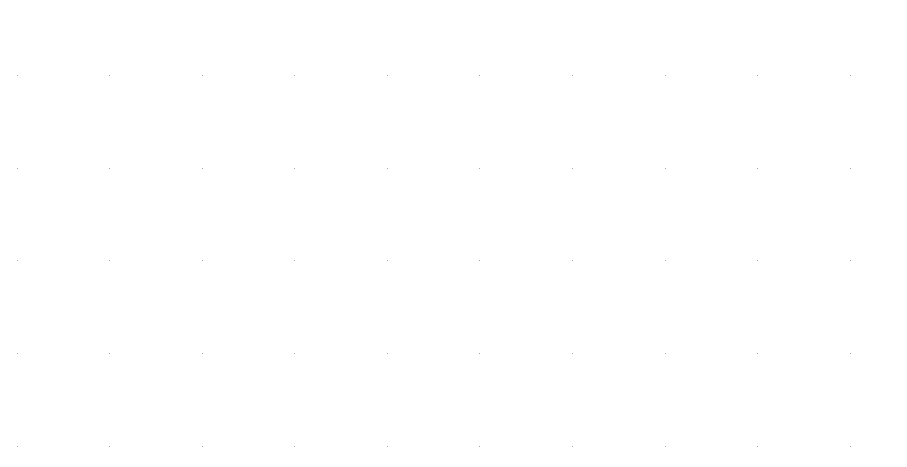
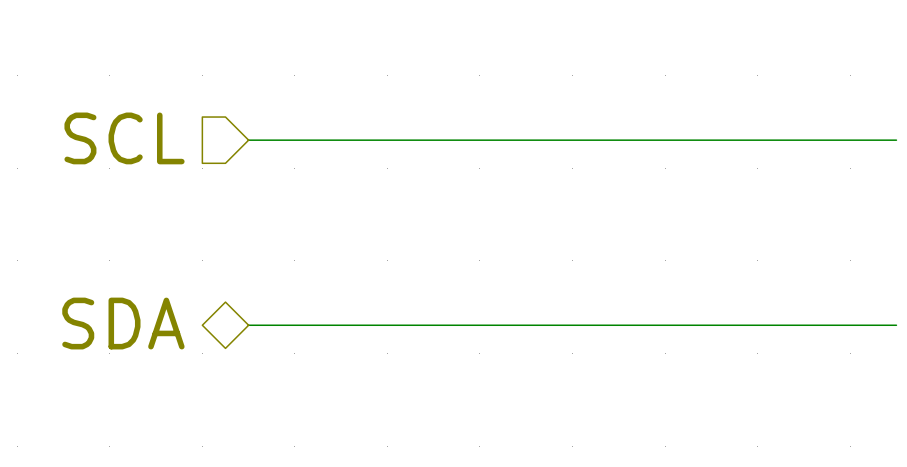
hierarchical label: none -> SCL (124, 138)
wire: none -> (248, 140) (896, 140)
hierarchical label: none -> SDA (123, 323)
wire: none -> (248, 325) (896, 325)

